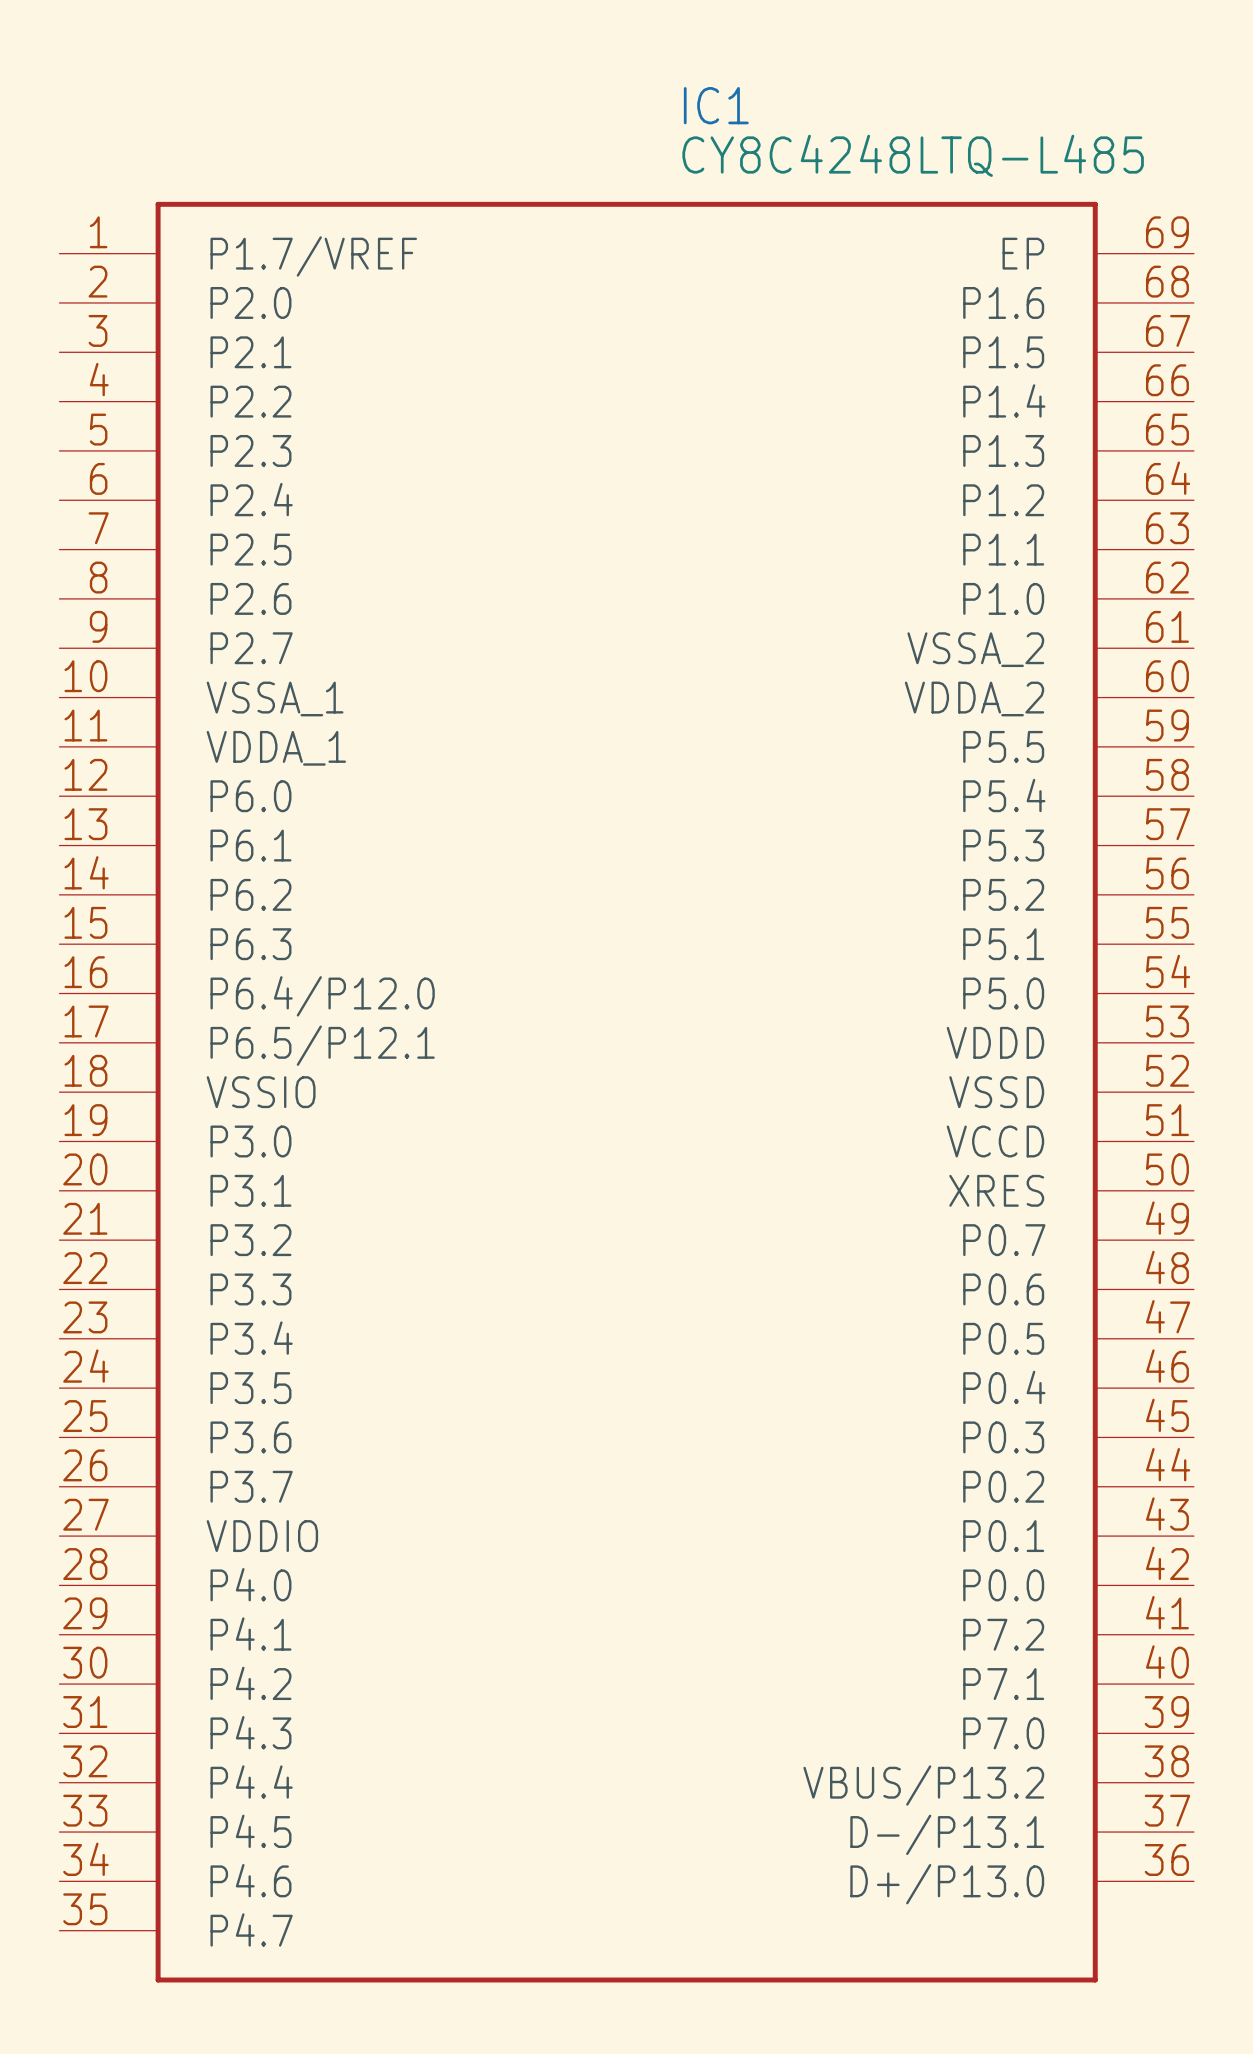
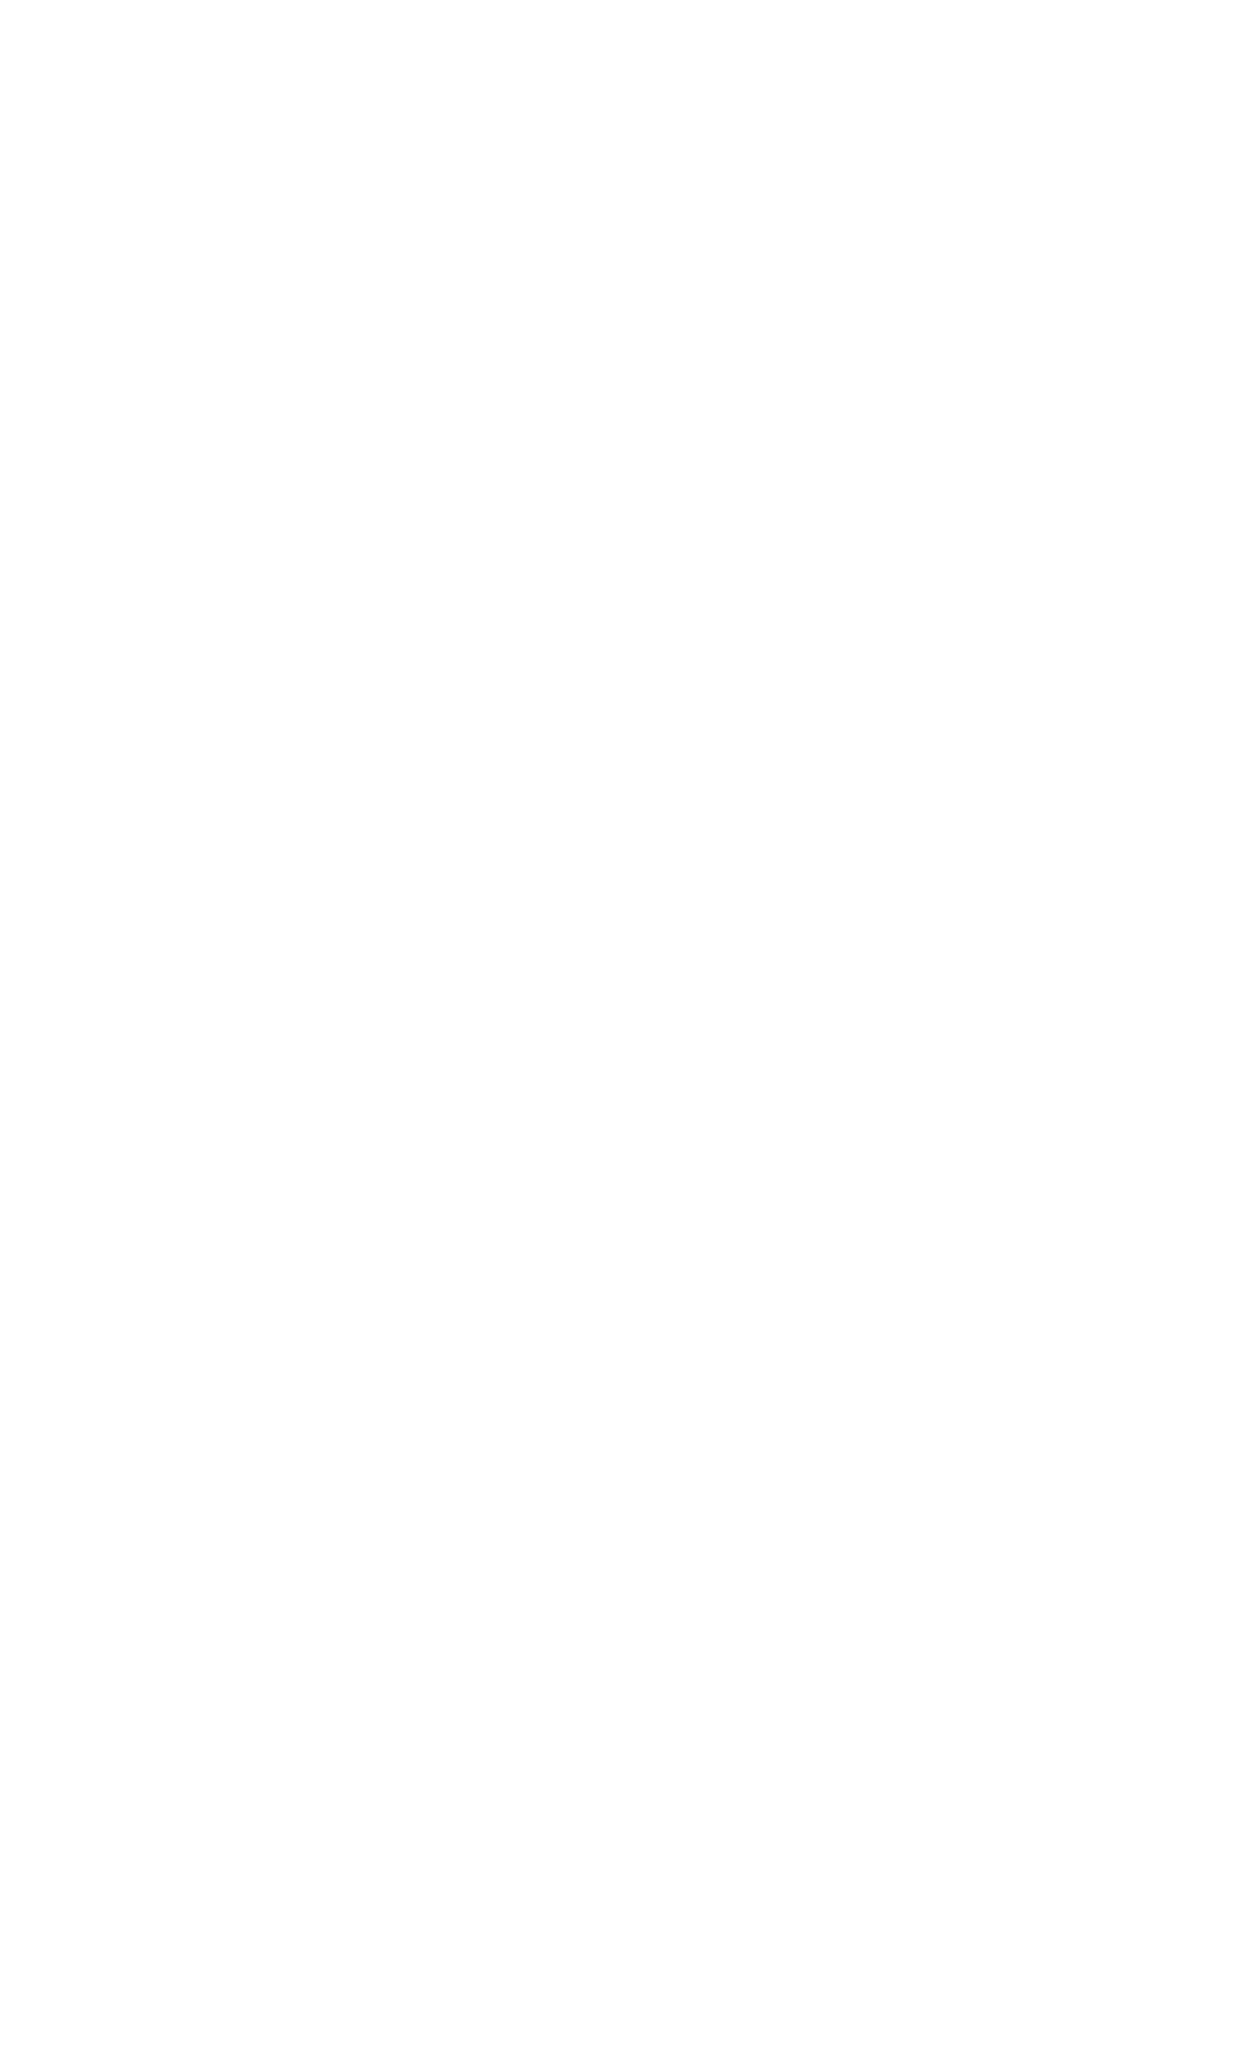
IC1: CY8C4248LTQ-L485 (626, 1092) -> none

